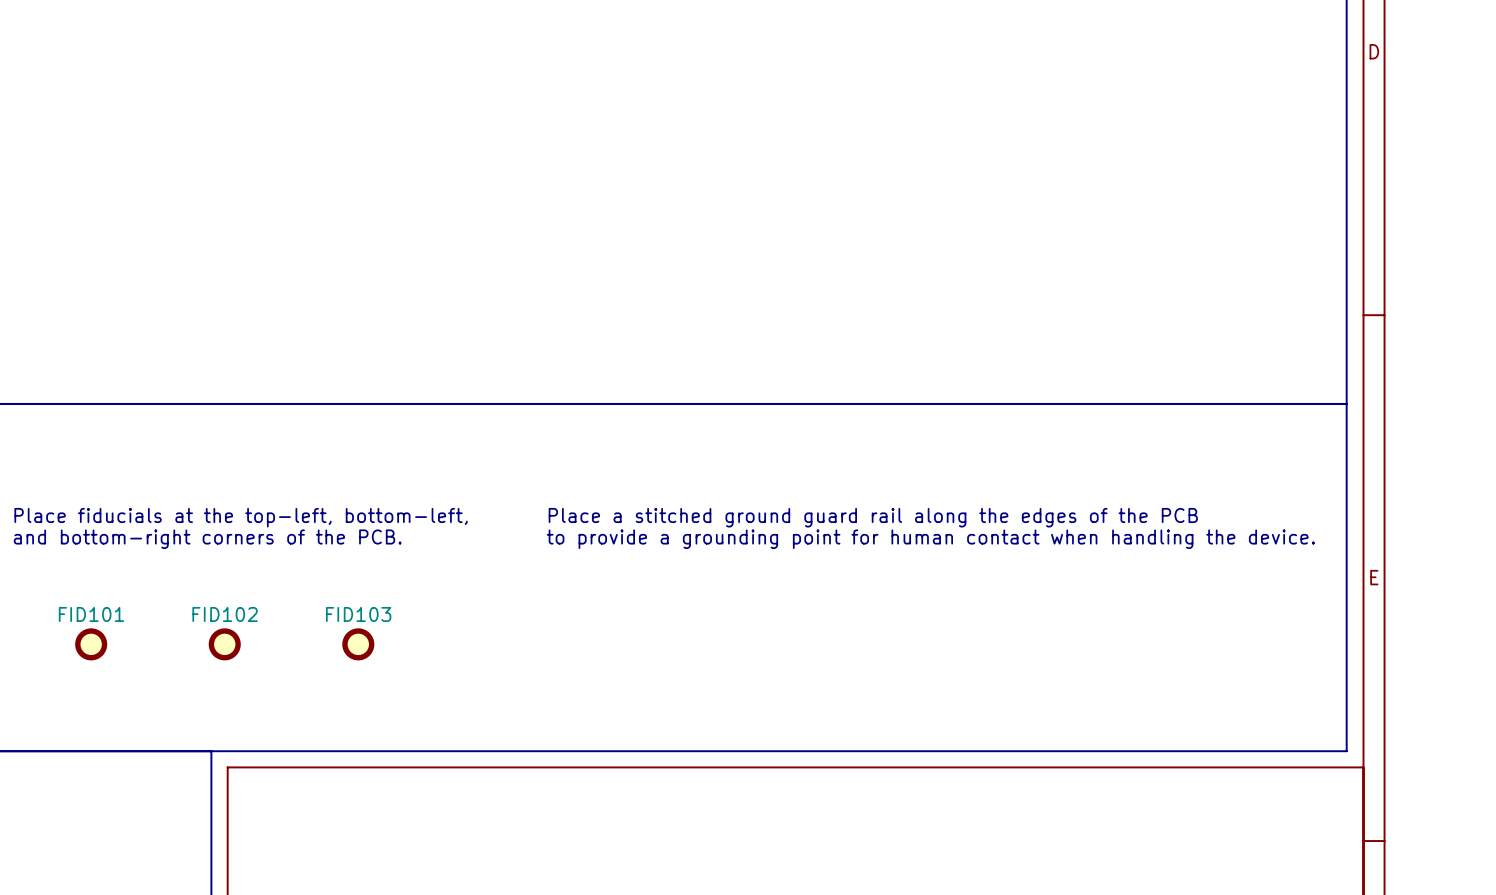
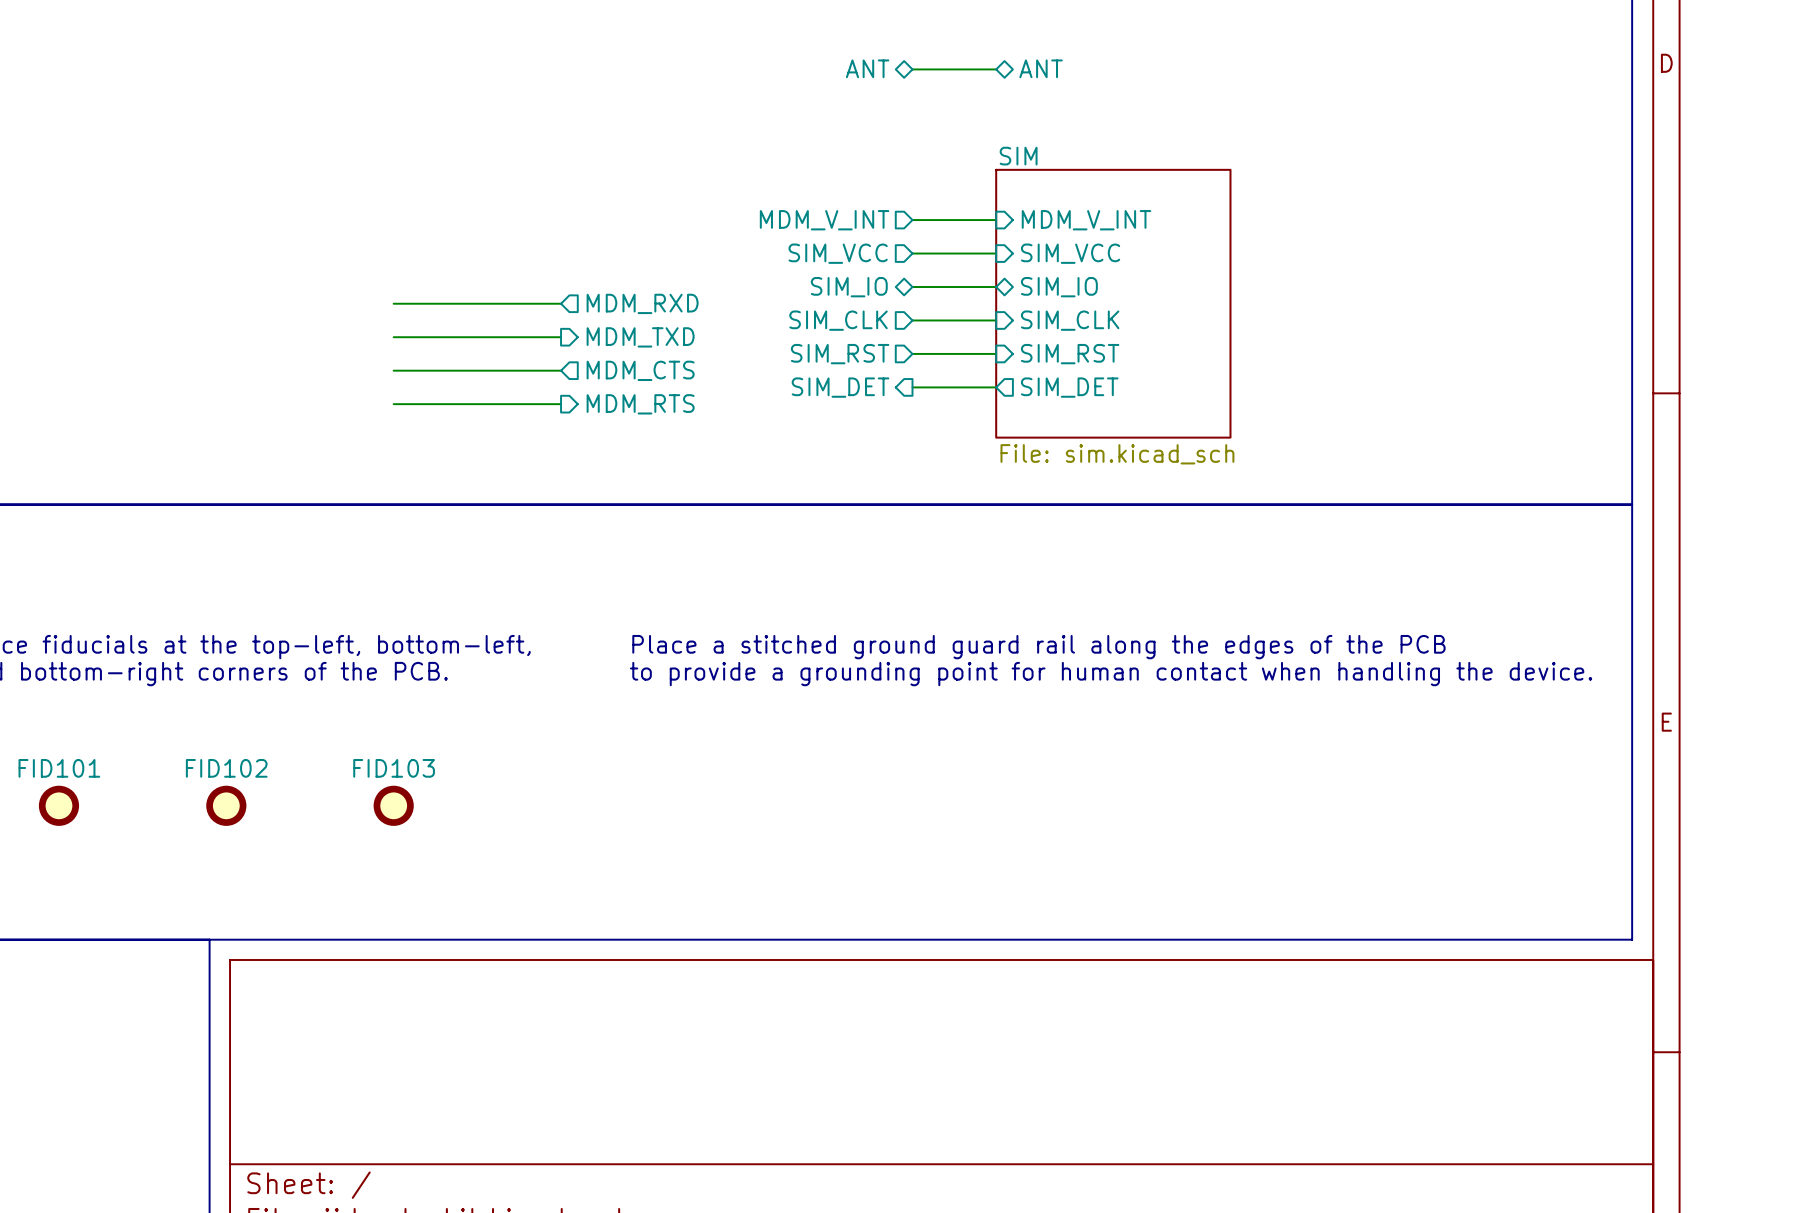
sheet pin: none -> ANT (867, 68)
wire: none -> (912, 69) (996, 69)
sheet pin: none -> ANT (1041, 68)
wire: none -> (912, 220) (996, 220)
sheet pin: none -> MDM_V_INT (824, 220)
sheet pin: none -> MDM_V_INT (1086, 220)
sheet pin: none -> SIM_VCC (838, 253)
wire: none -> (912, 253) (996, 253)
sheet pin: none -> SIM_VCC (1070, 253)
sheet pin: none -> SIM_IO (849, 287)
wire: none -> (912, 287) (996, 287)
sheet pin: none -> SIM_IO (1059, 287)
wire: none -> (393, 303) (561, 303)
sheet pin: none -> MDM_RXD (642, 303)
sheet SIM: none -> File: sim.kicad_sch (1113, 303)
sheet pin: none -> SIM_CLK (838, 320)
wire: none -> (912, 320) (996, 320)
sheet pin: none -> SIM_CLK (1070, 320)
wire: none -> (393, 337) (561, 337)
sheet pin: none -> MDM_TXD (640, 337)
sheet pin: none -> SIM_RST (840, 354)
wire: none -> (912, 353) (996, 353)
sheet pin: none -> SIM_RST (1070, 354)
wire: none -> (393, 370) (561, 370)
sheet pin: none -> MDM_CTS (640, 370)
sheet pin: none -> SIM_DET (840, 387)
wire: none -> (912, 387) (996, 387)
sheet pin: none -> SIM_DET (1069, 387)
wire: none -> (393, 404) (561, 404)
sheet pin: none -> MDM_RTS (640, 404)

